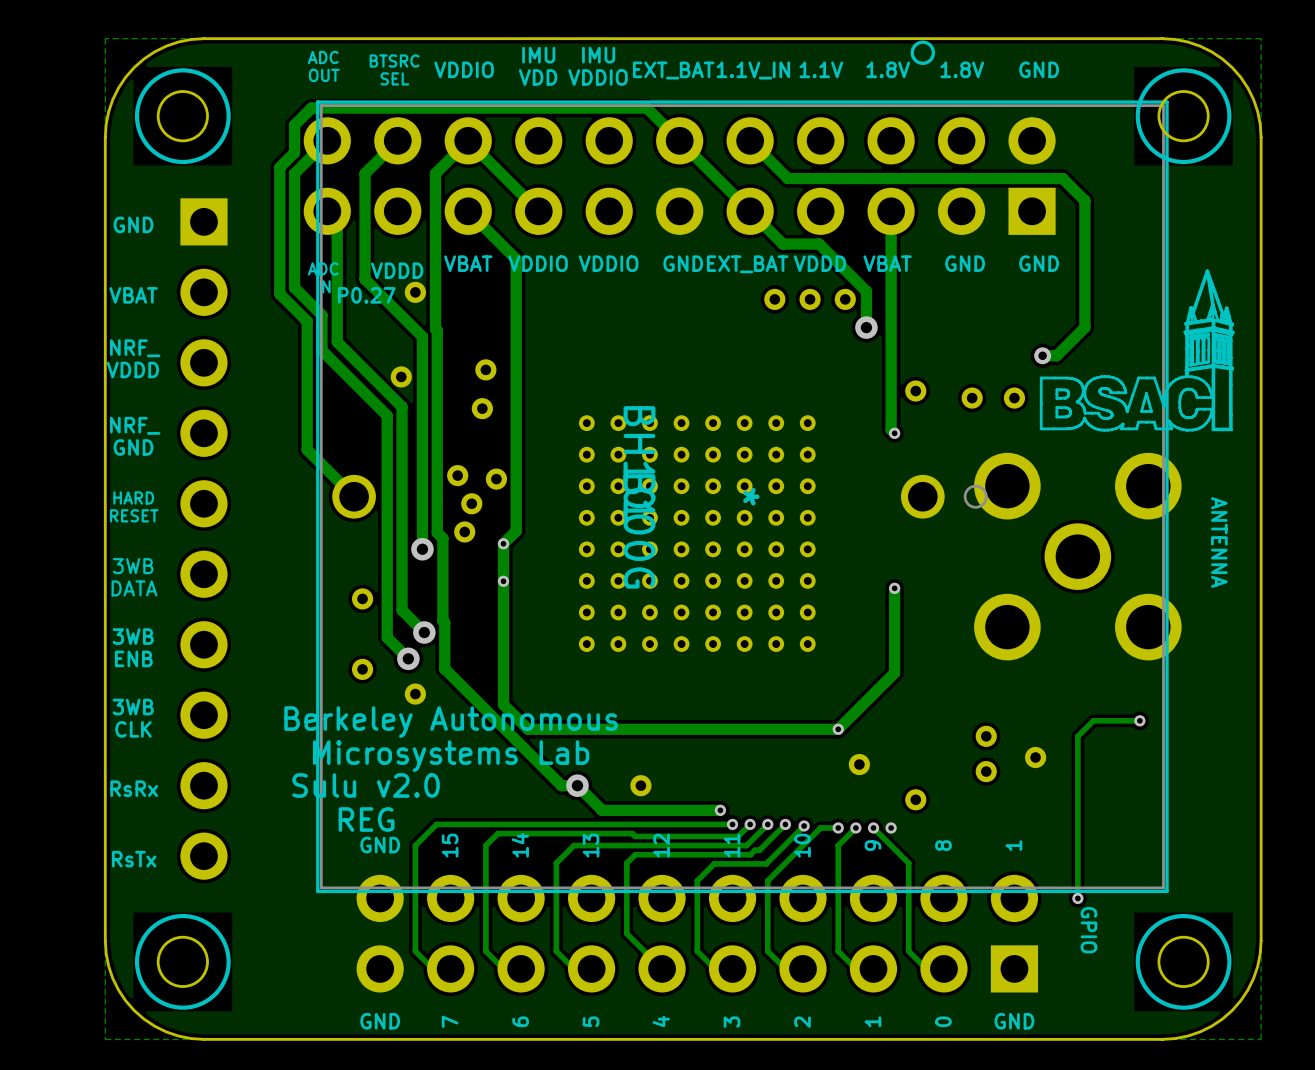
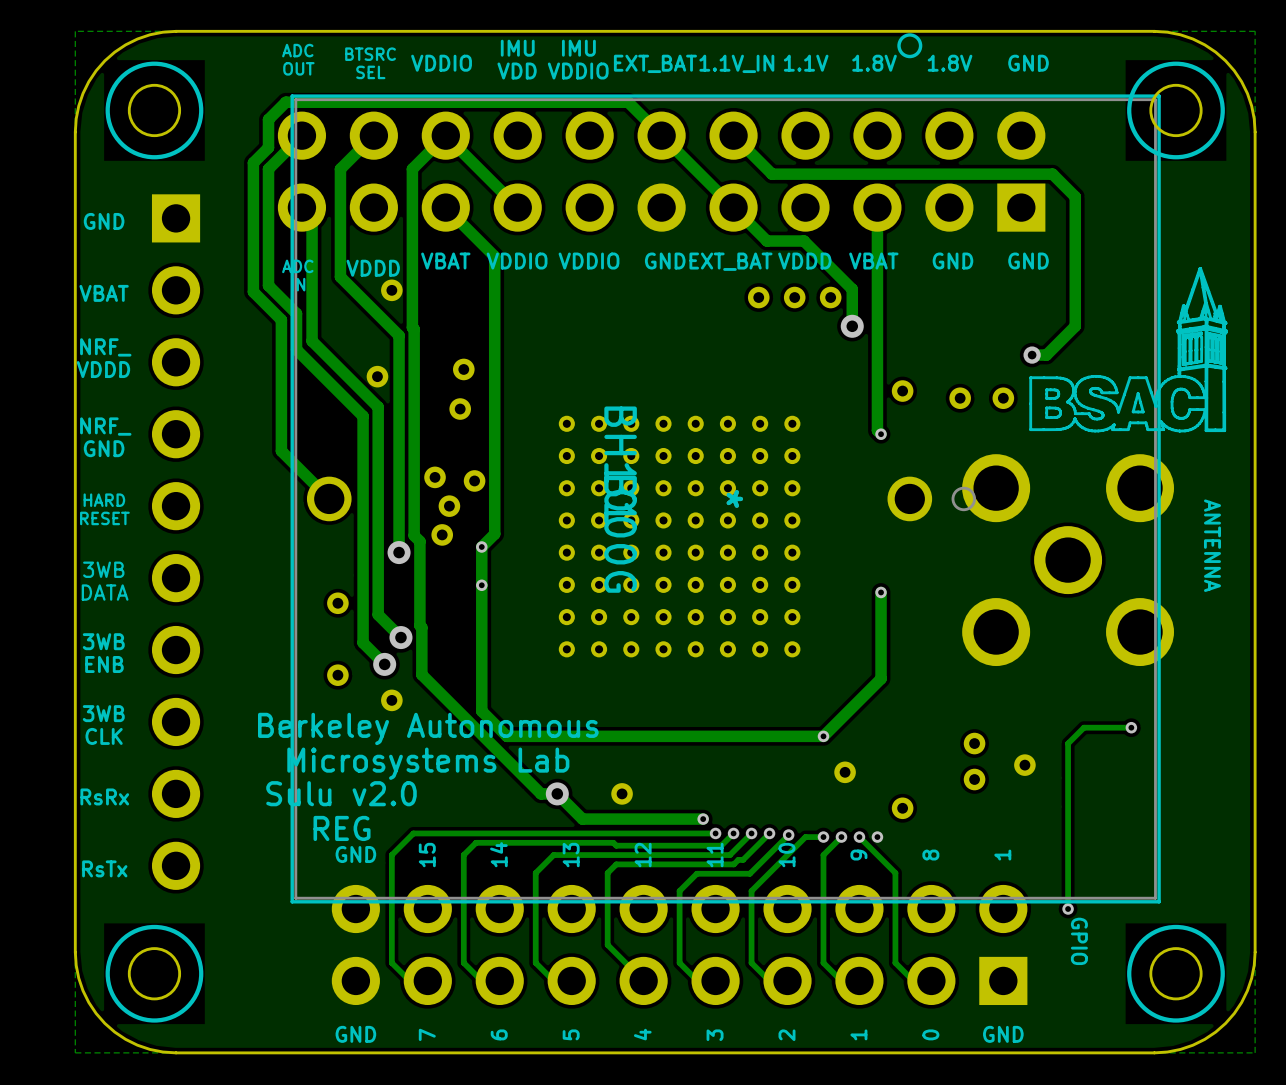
text: P0.27 (366, 295) -> none

